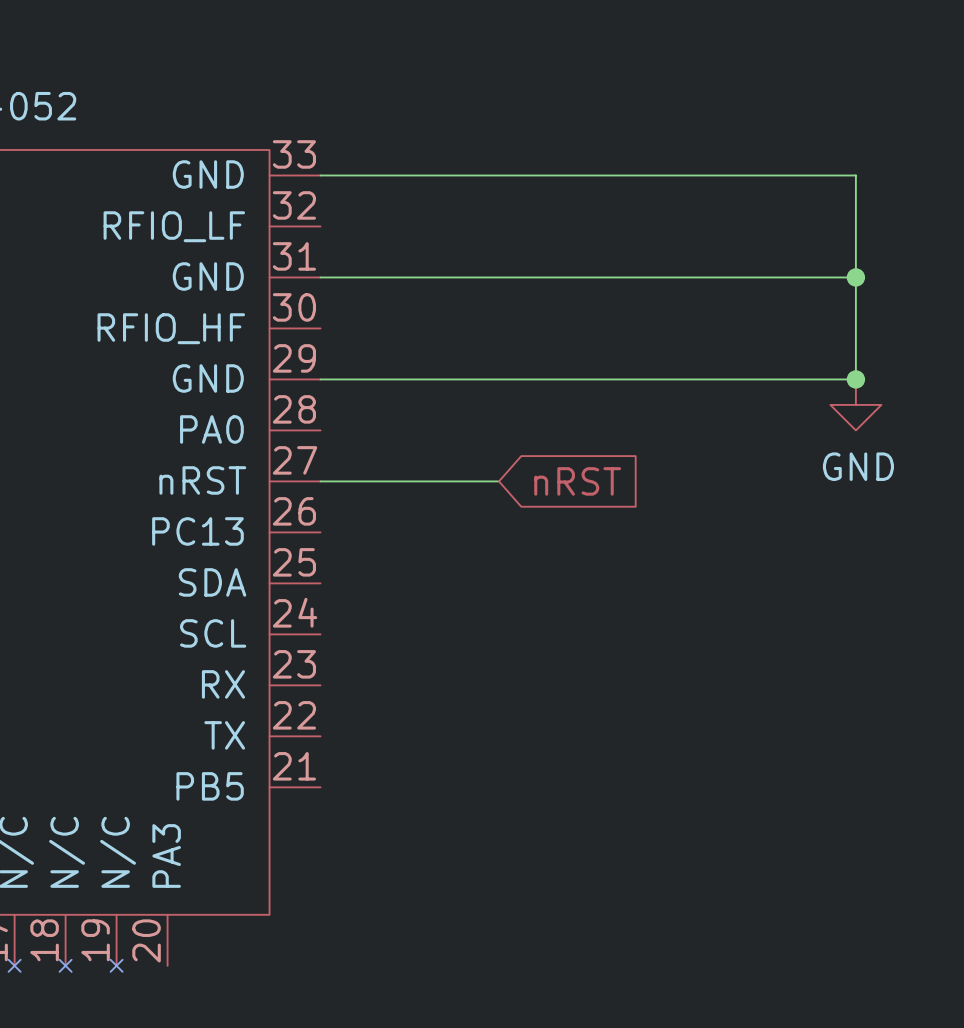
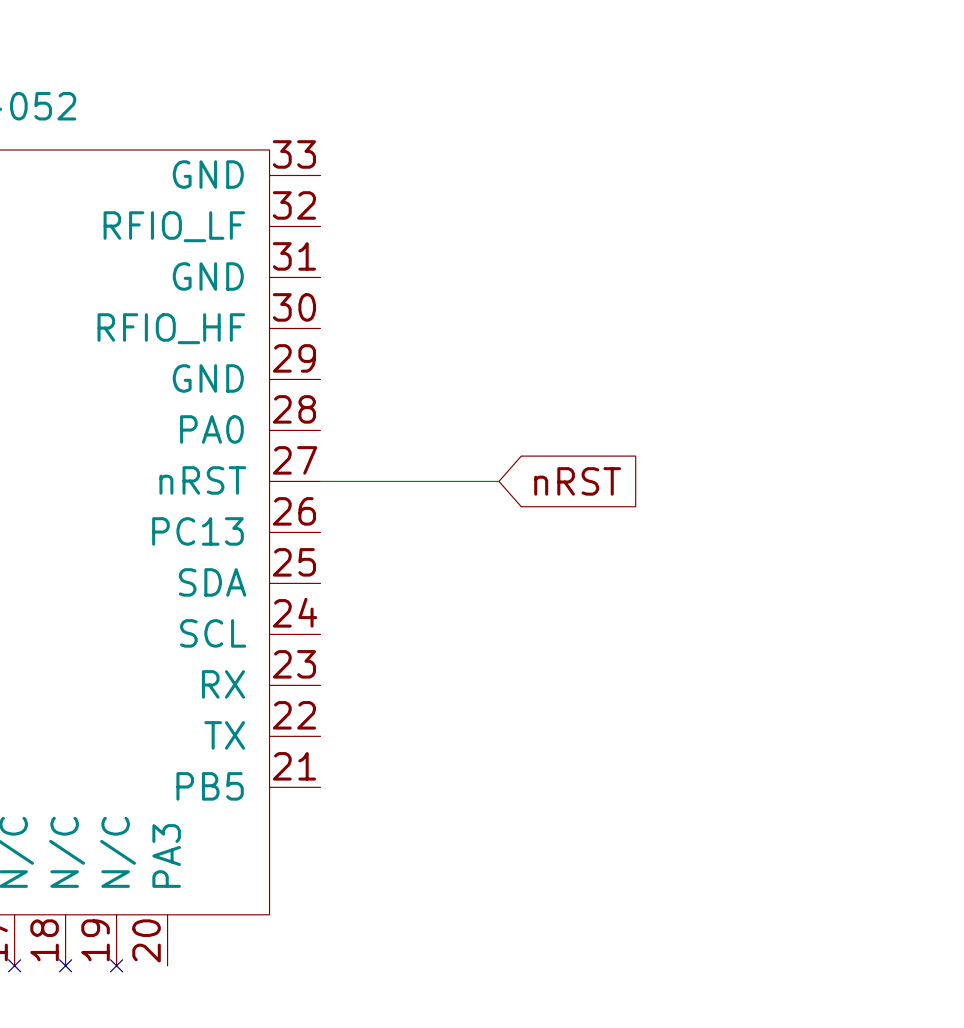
wire: (320, 175) (855, 175) (855, 379) (320, 379) -> none
wire: (320, 277) (855, 277) -> none
junction: (855, 277) -> none
junction: (855, 379) -> none
power symbol: GND (855, 404) -> none

